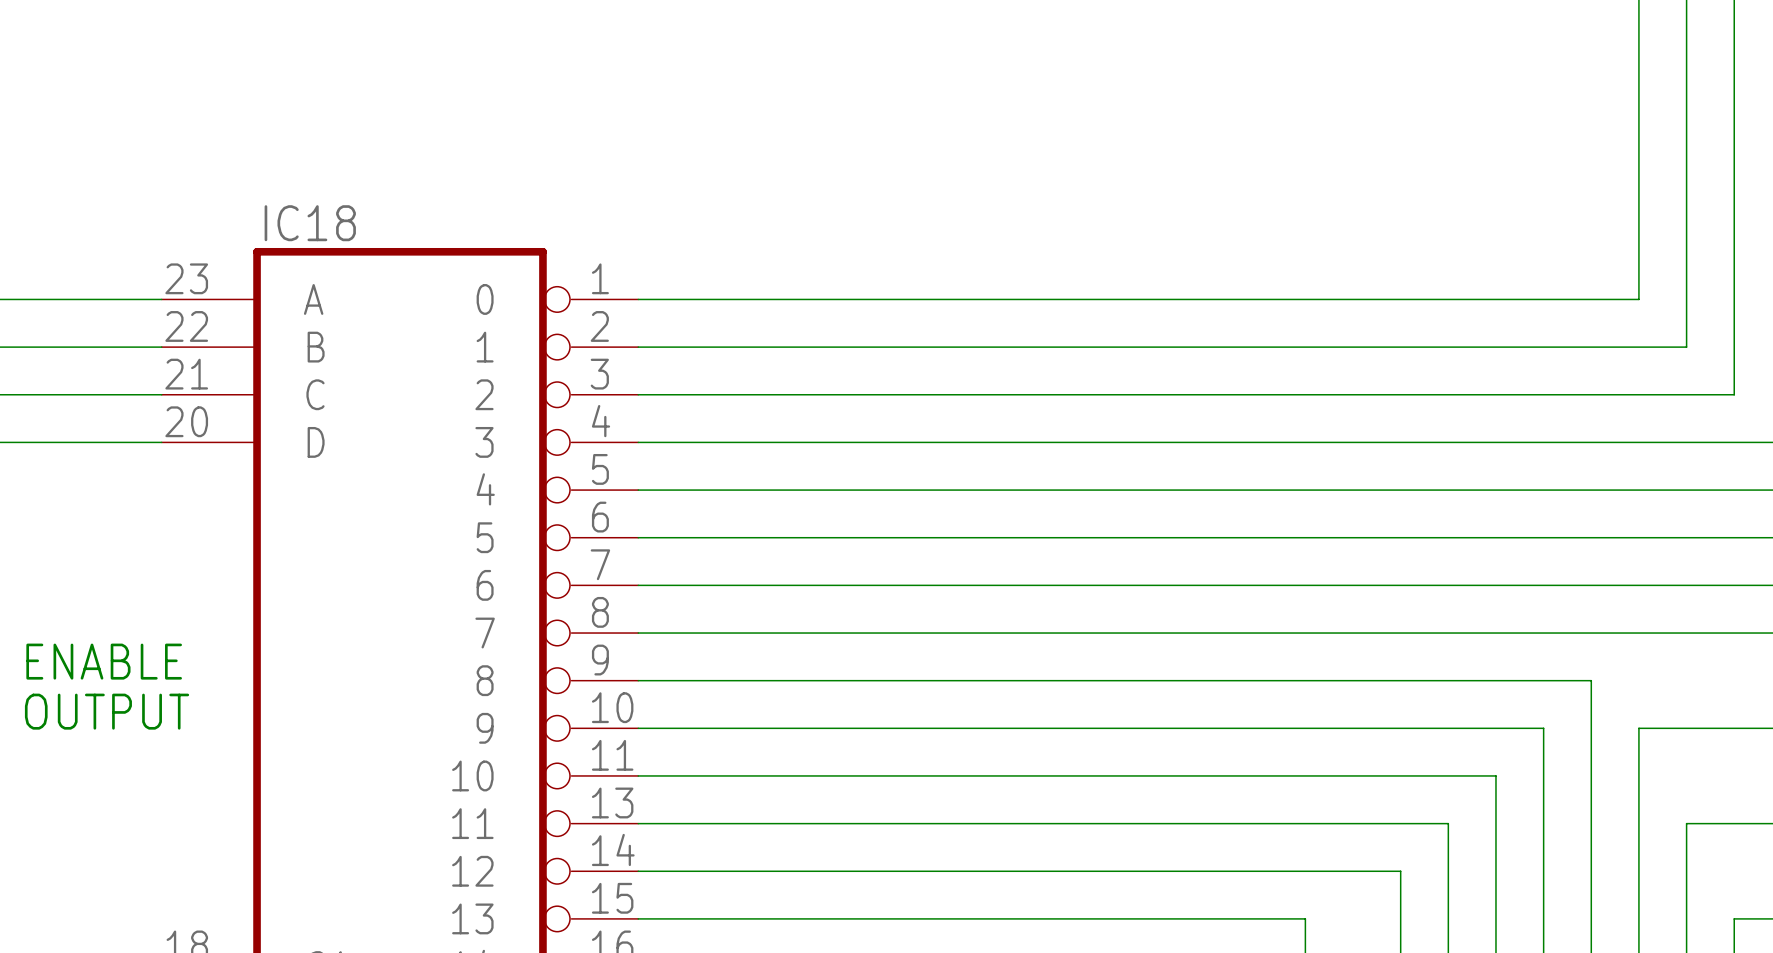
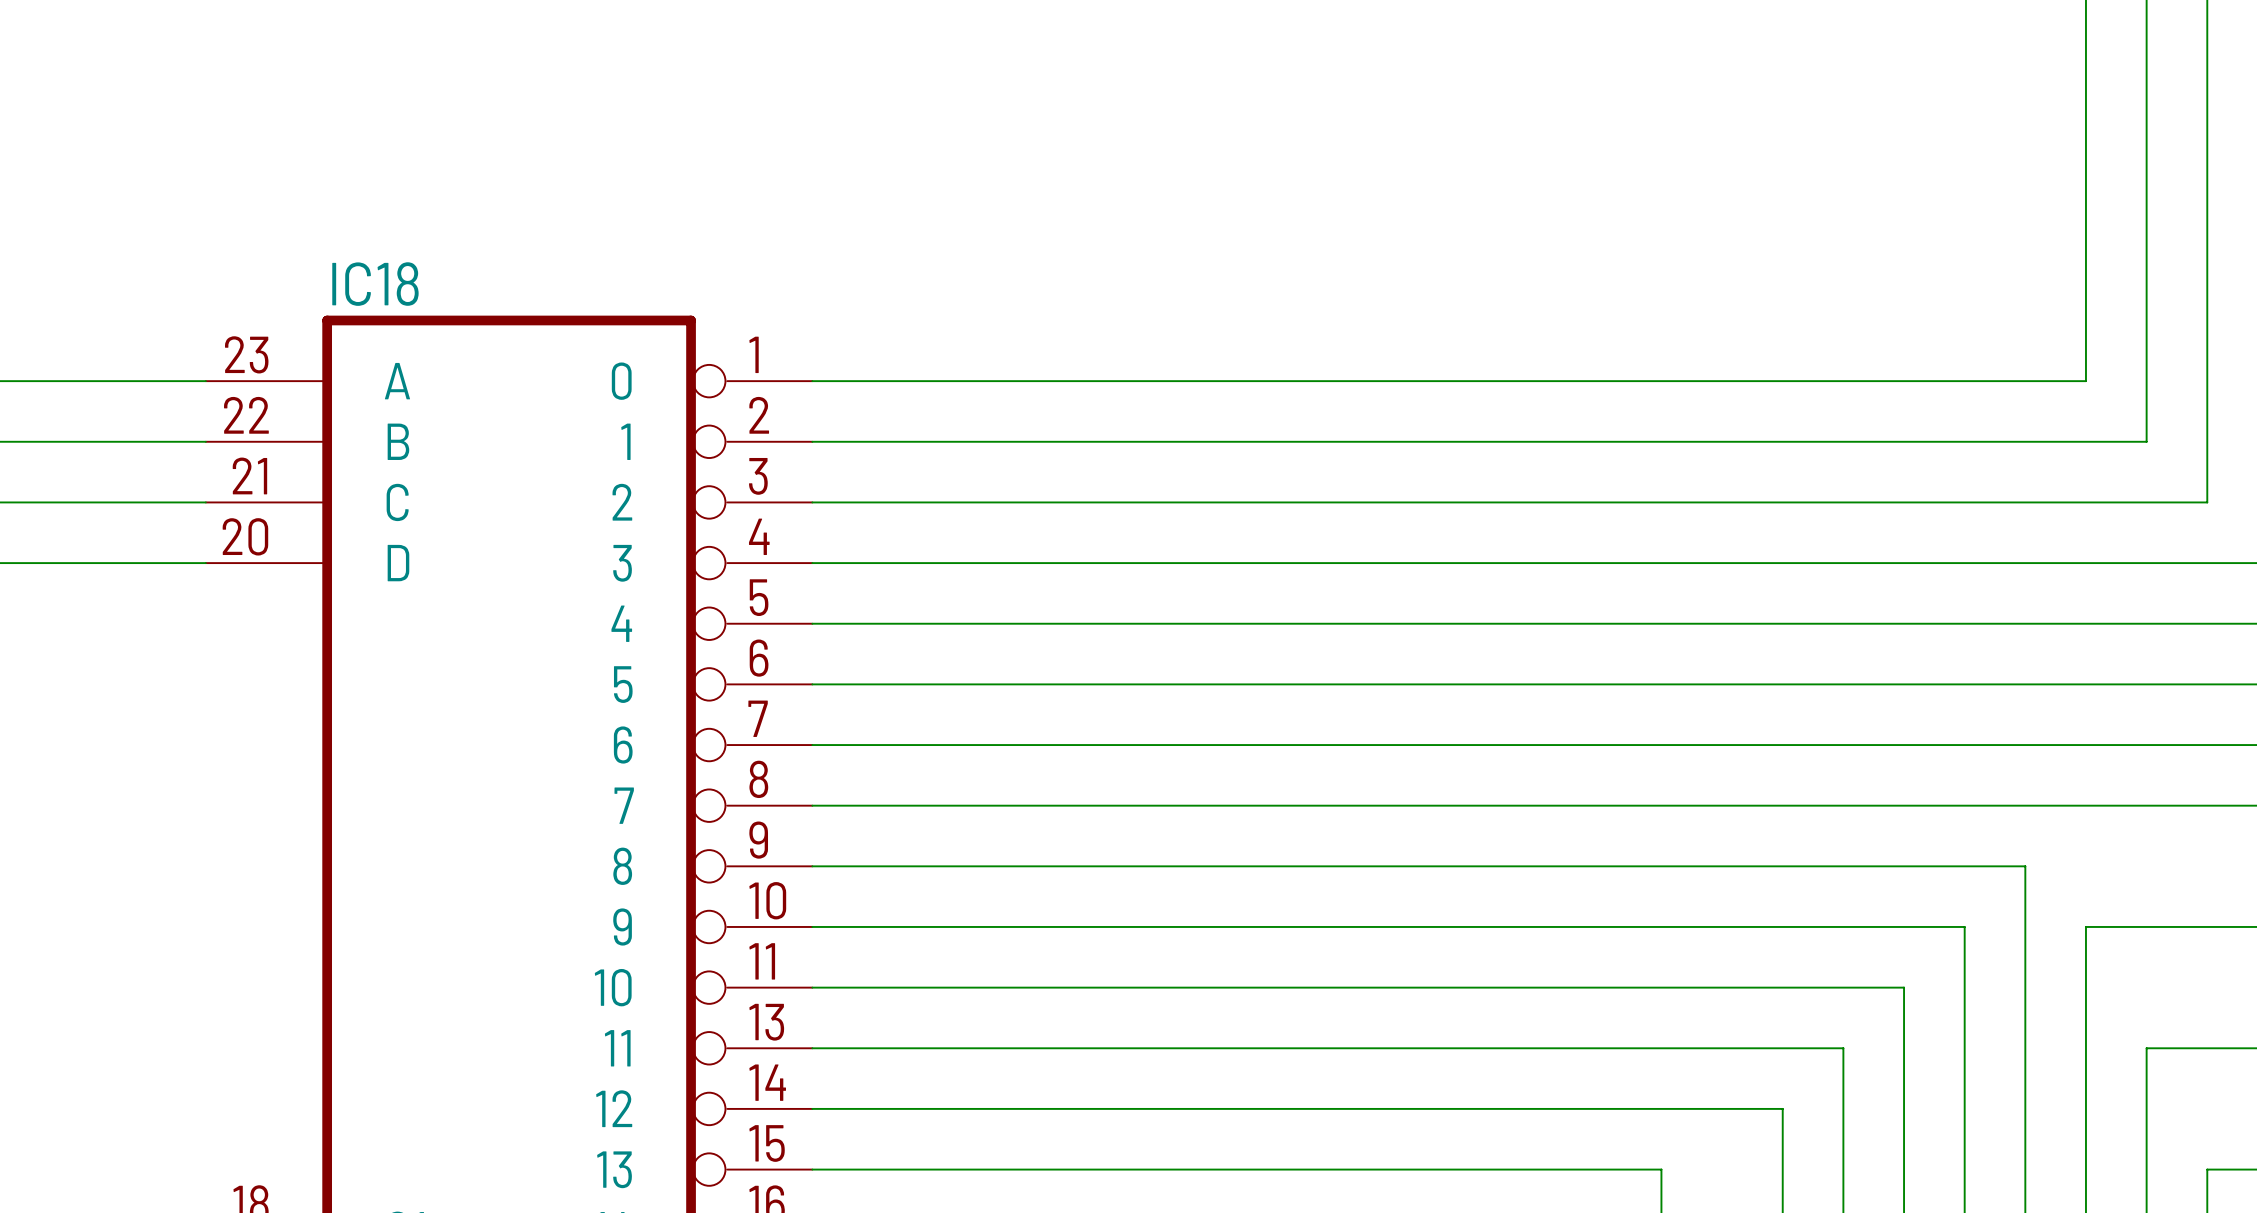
text: ENABLE (104, 661) -> none
text: OUTPUT (107, 711) -> none

